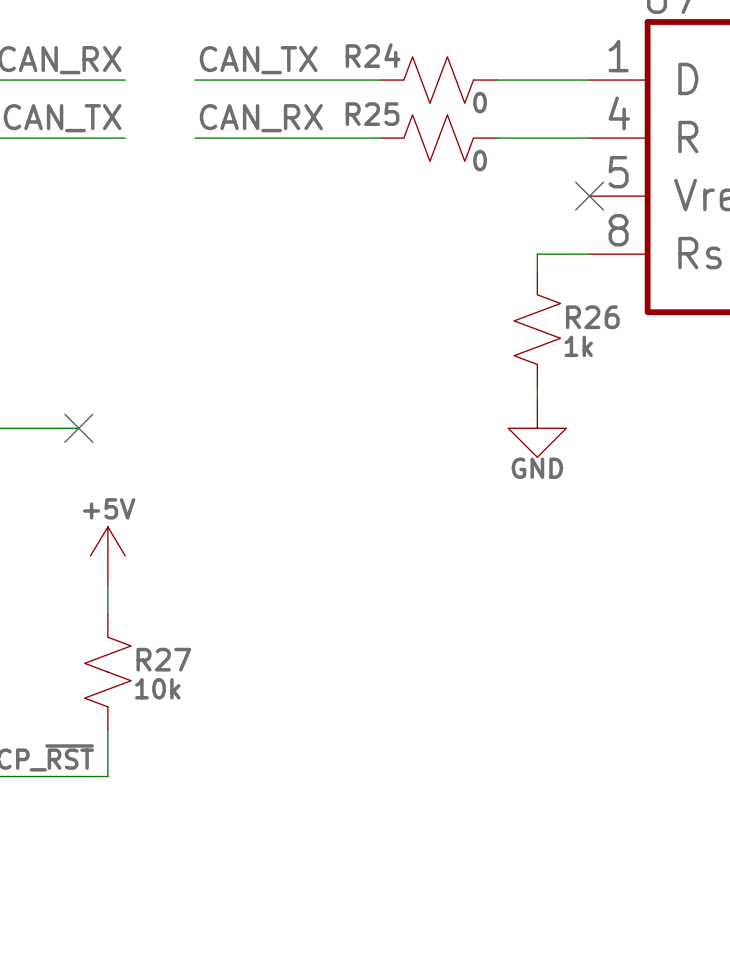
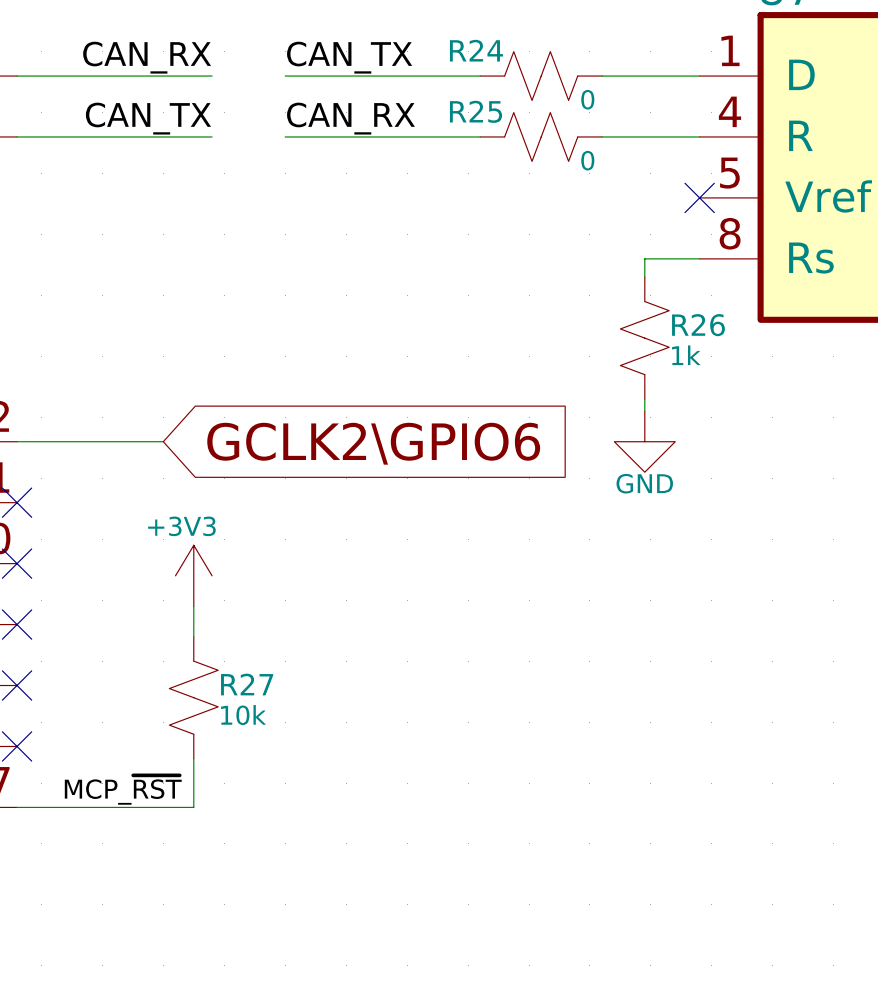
no-connect mark: (78, 428) -> none
global label: none -> GCLK2\GPIO6 (373, 443)
power symbol: +5V (107, 555) -> +3V3 (193, 575)

